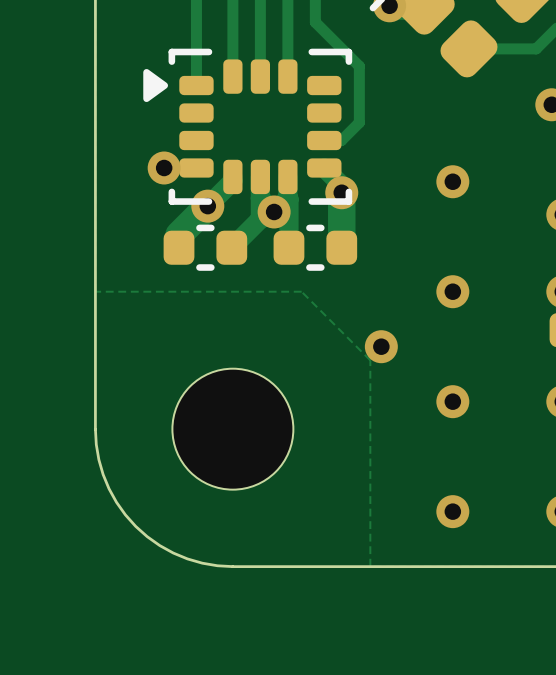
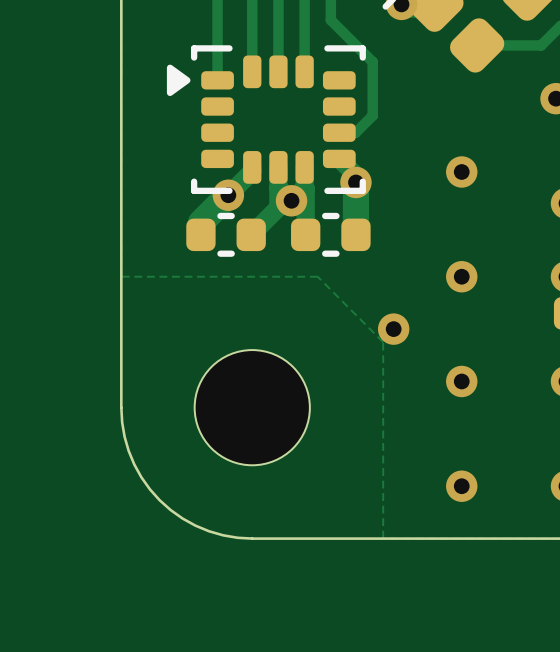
via: (164, 168) -> none

